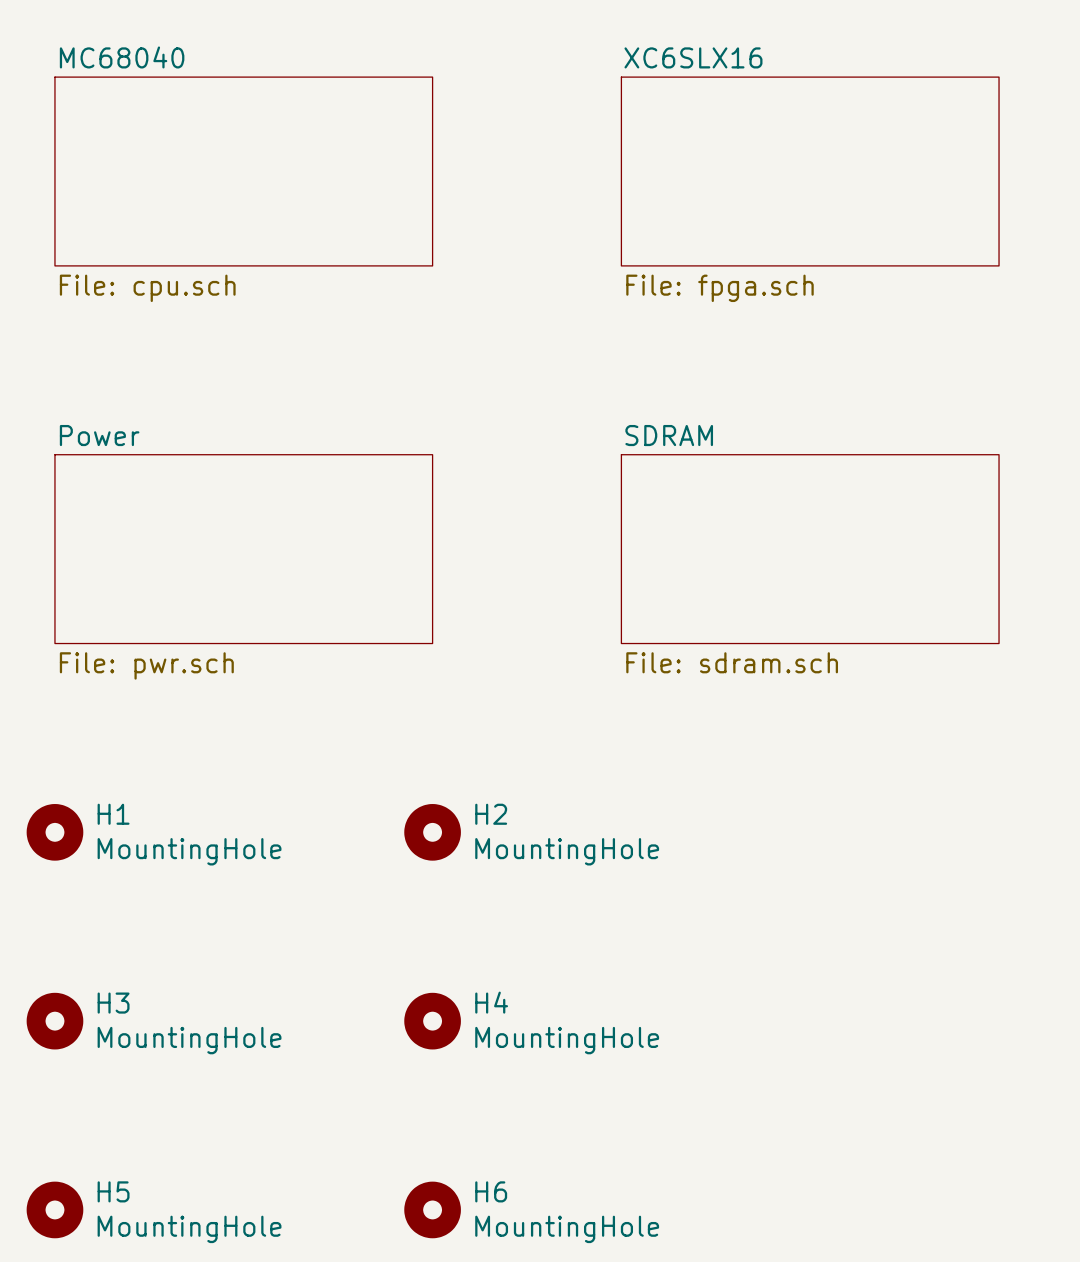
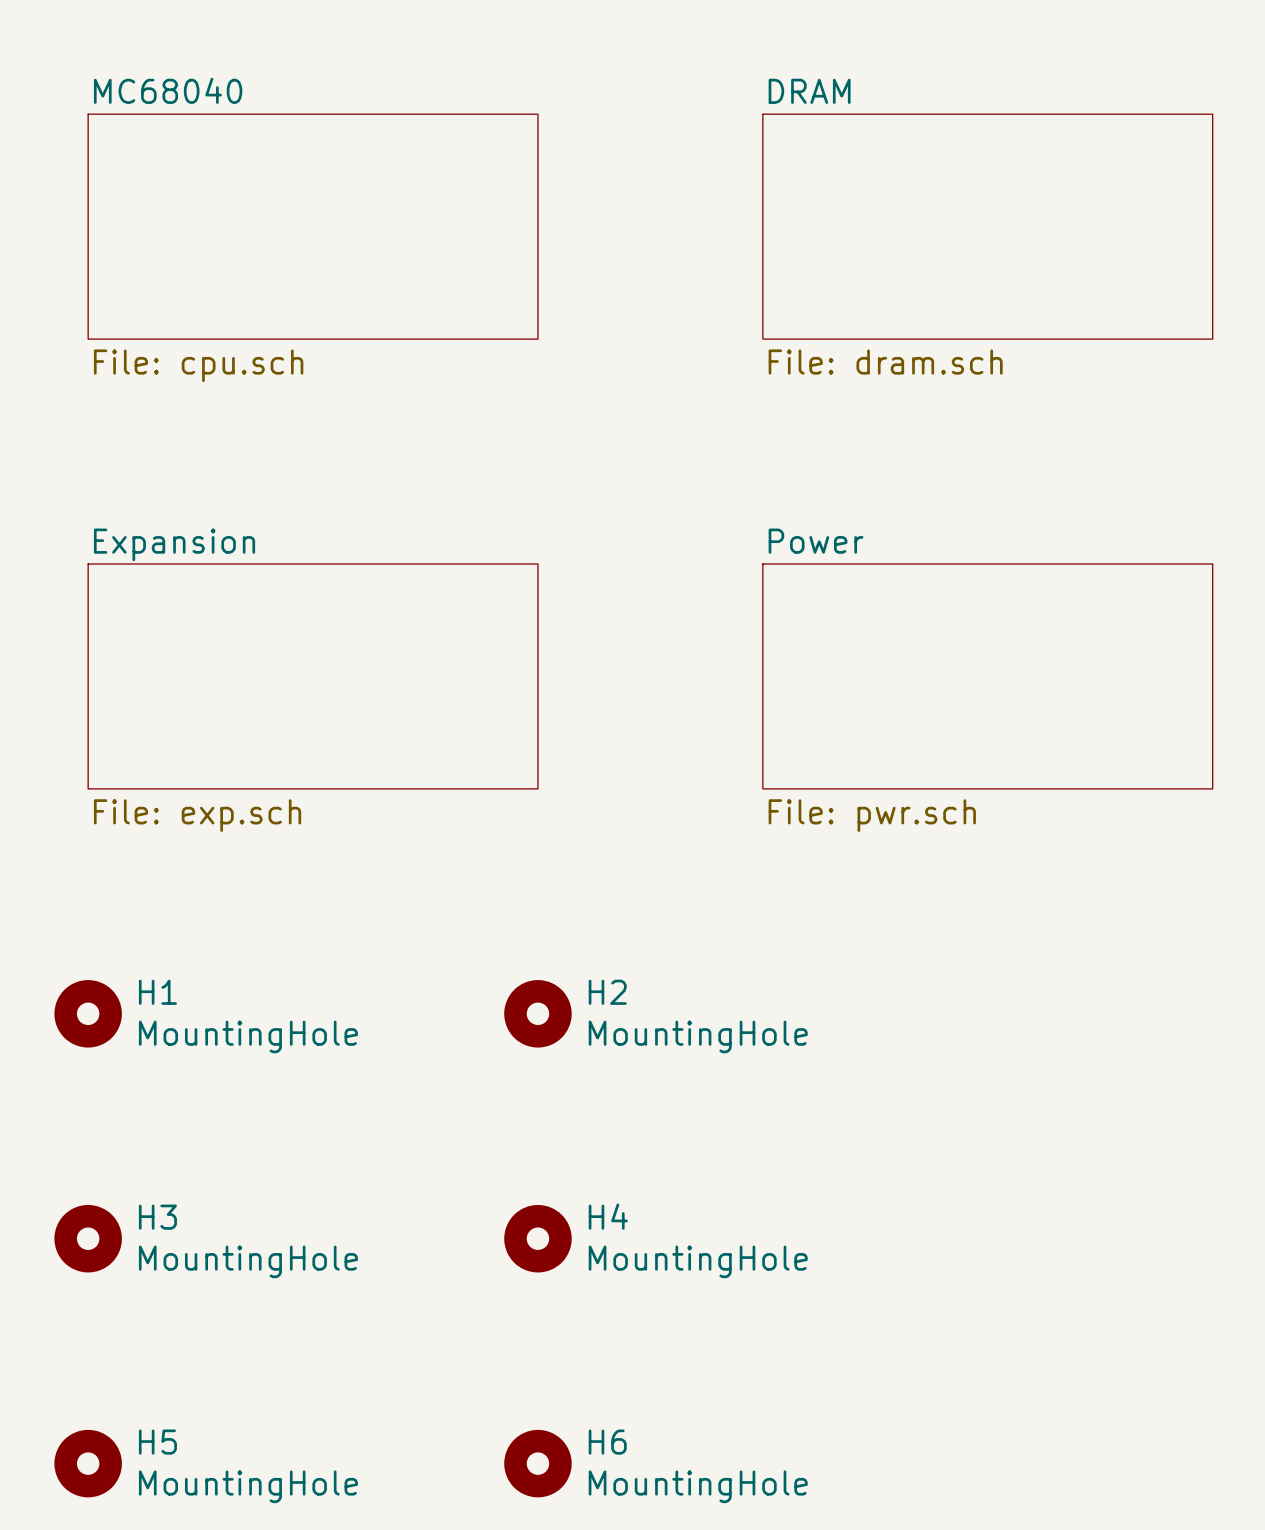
sheet XC6SLX16 name: XC6SLX16 (693, 57) -> DRAM (809, 91)
sheet XC6SLX16 value: File: fpga.sch (719, 288) -> File: dram.sch (885, 362)
sheet Power name: Power (99, 435) -> Expansion (174, 544)
sheet SDRAM name: SDRAM (669, 435) -> Power (816, 541)
sheet SDRAM value: File: sdram.sch (732, 662) -> File: pwr.sch (872, 815)
sheet Power value: File: pwr.sch (146, 665) -> File: exp.sch (197, 815)

